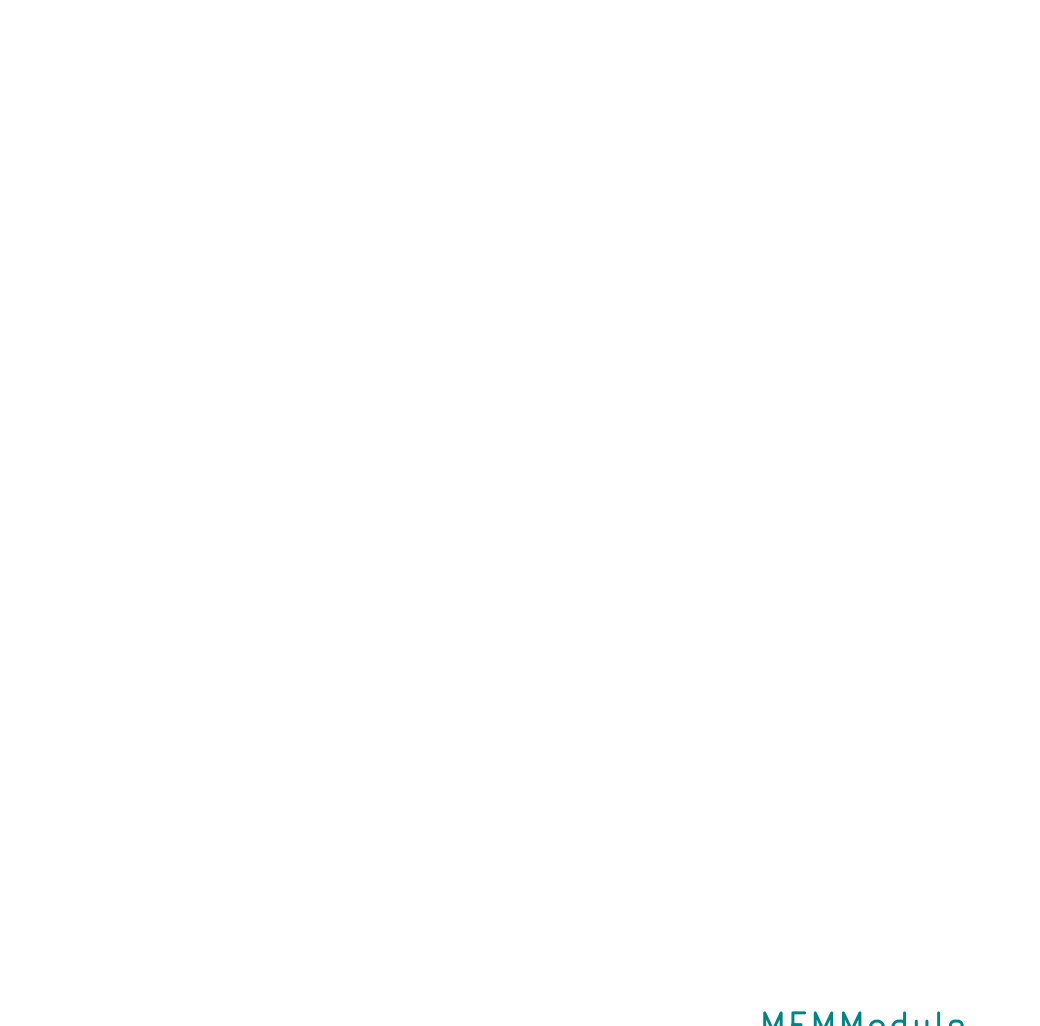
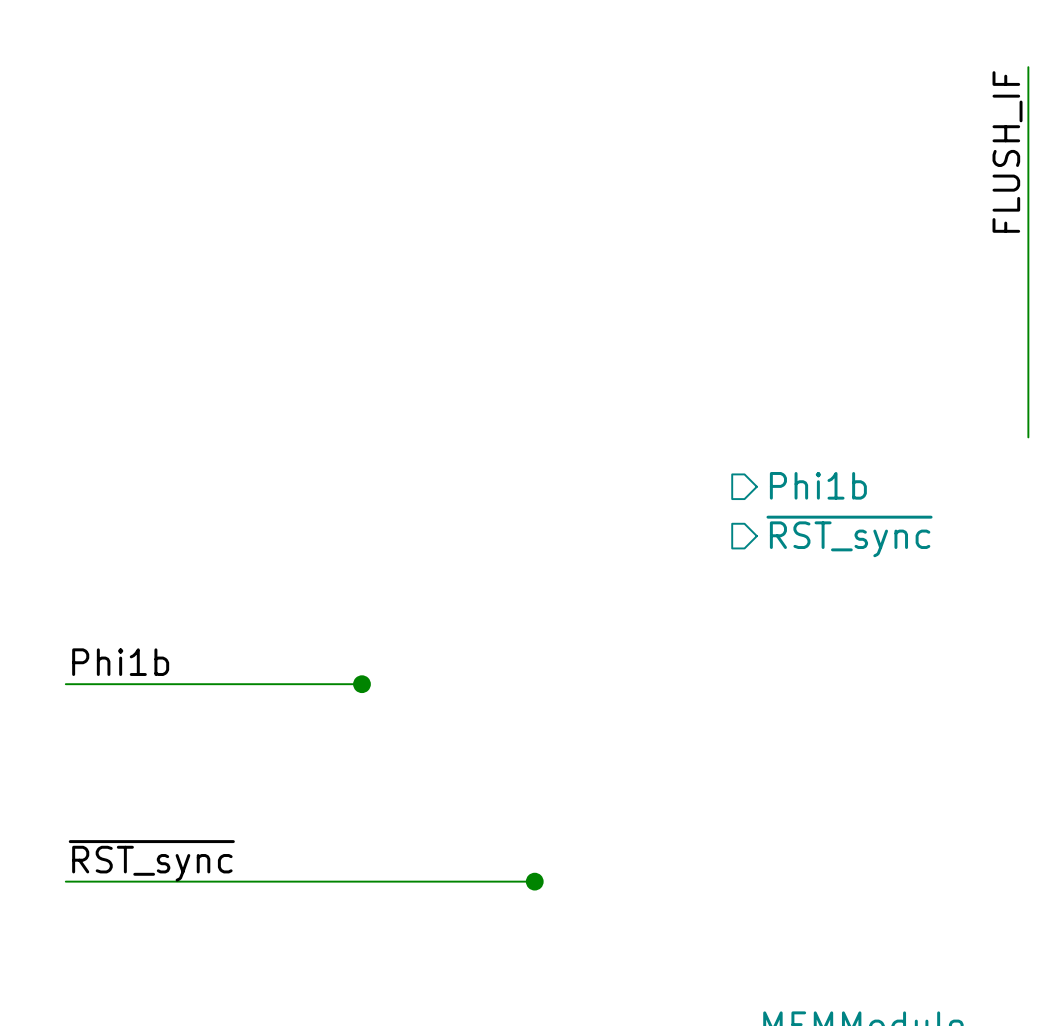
wire: none -> (1028, 67) (1028, 437)
label: none -> FLUSH_IF (1007, 151)
sheet pin: none -> Phi1b (818, 485)
sheet pin: none -> ~{RST_sync} (849, 536)
label: none -> Phi1b (120, 662)
wire: none -> (65, 684) (361, 684)
junction: none -> (361, 684)
label: none -> ~{RST_sync} (151, 860)
wire: none -> (65, 881) (534, 881)
junction: none -> (534, 881)

